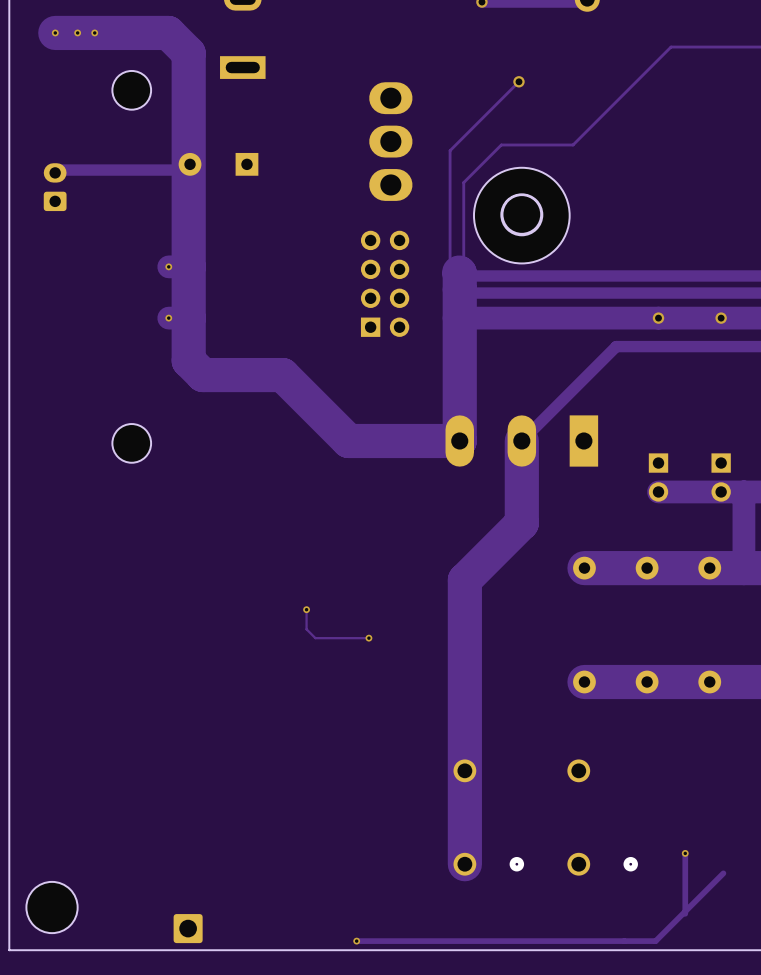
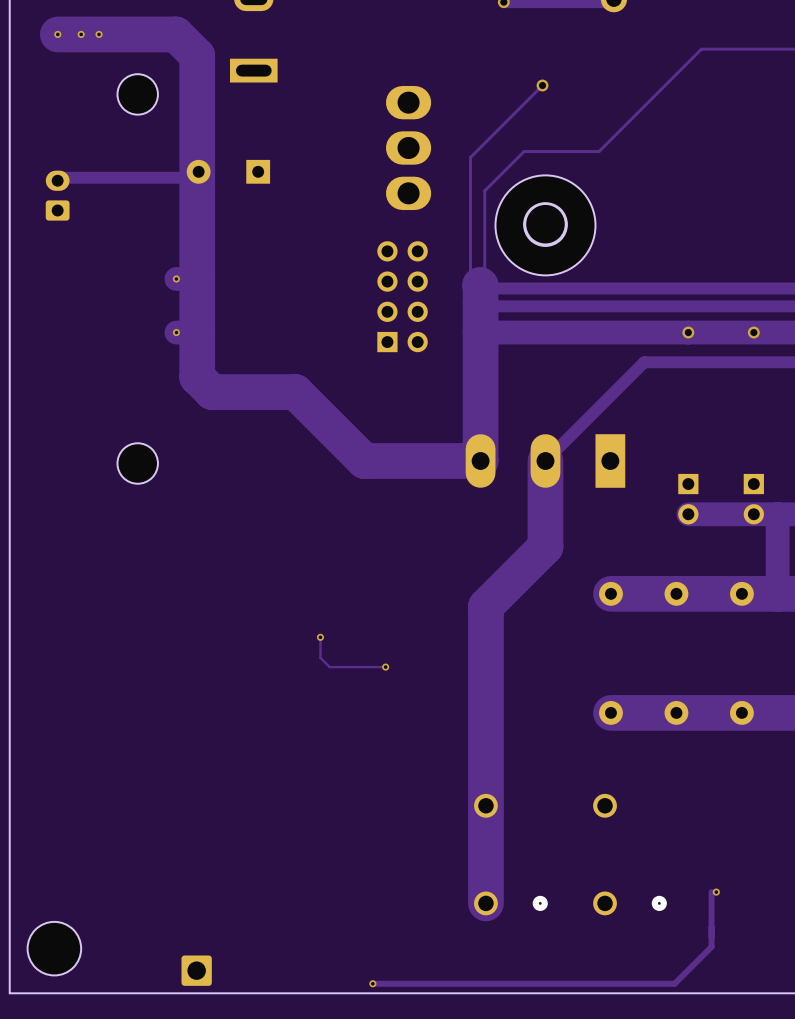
track: (685, 853) (685, 913) -> none
track: (723, 873) (655, 941) (645, 941) -> (711, 892) (711, 946) (674, 983)

